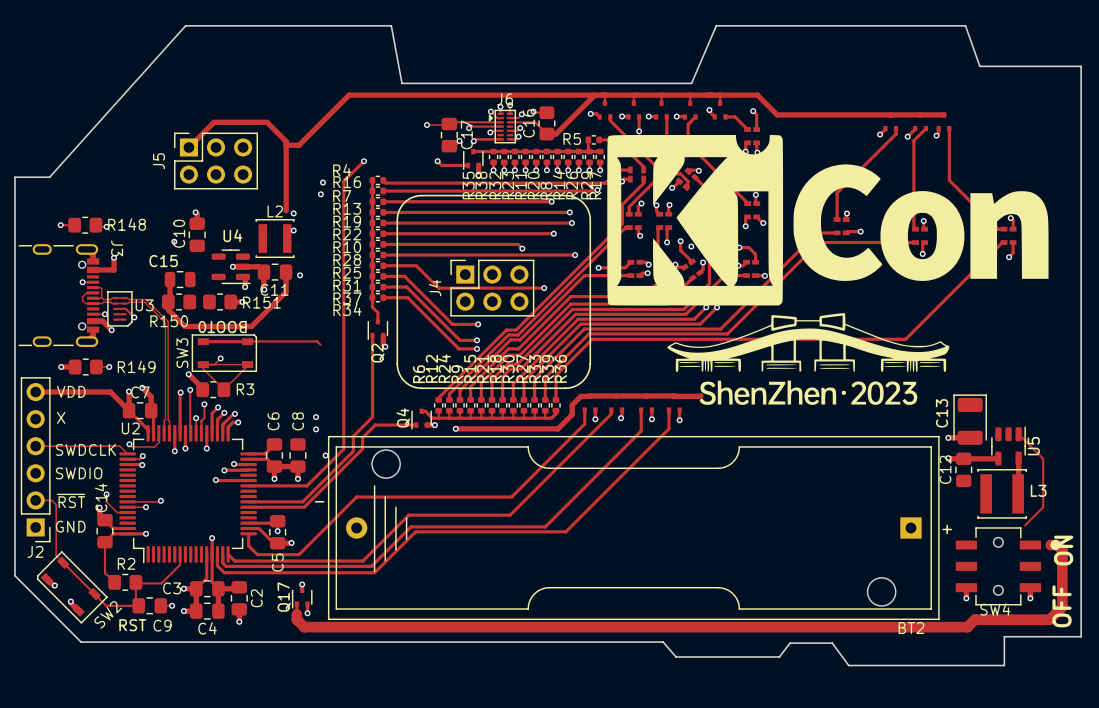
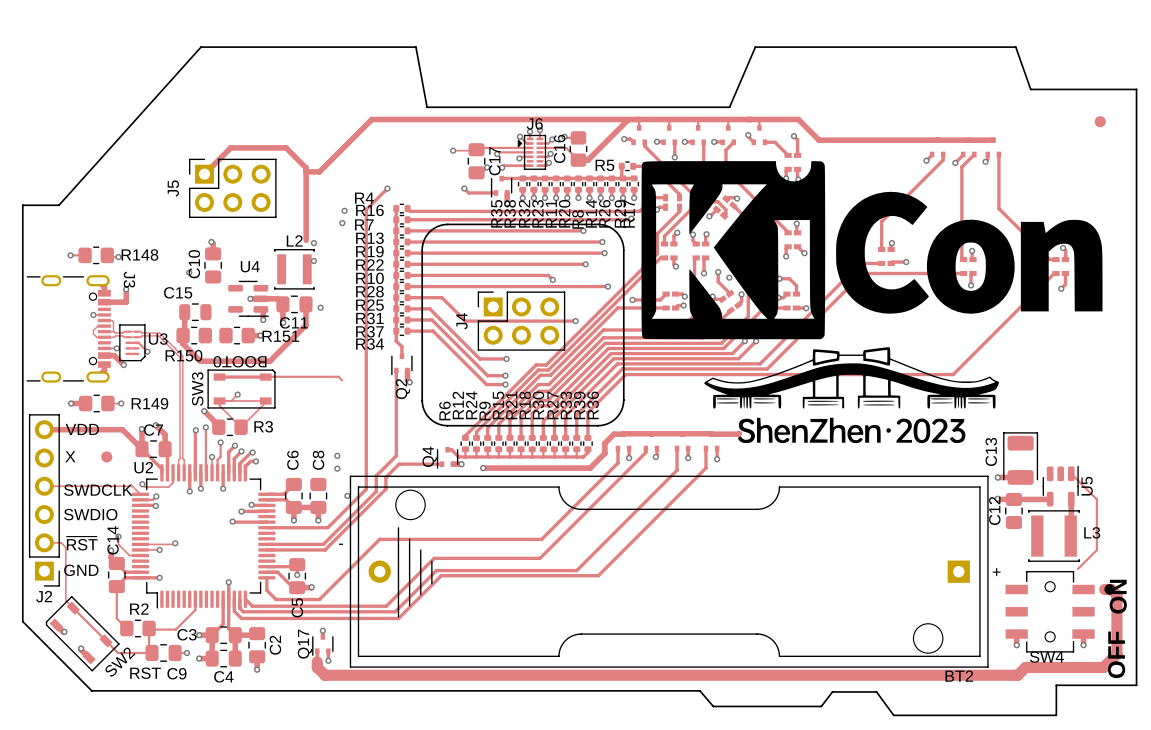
part: none -> (1100, 121)
part: none -> (106, 456)

